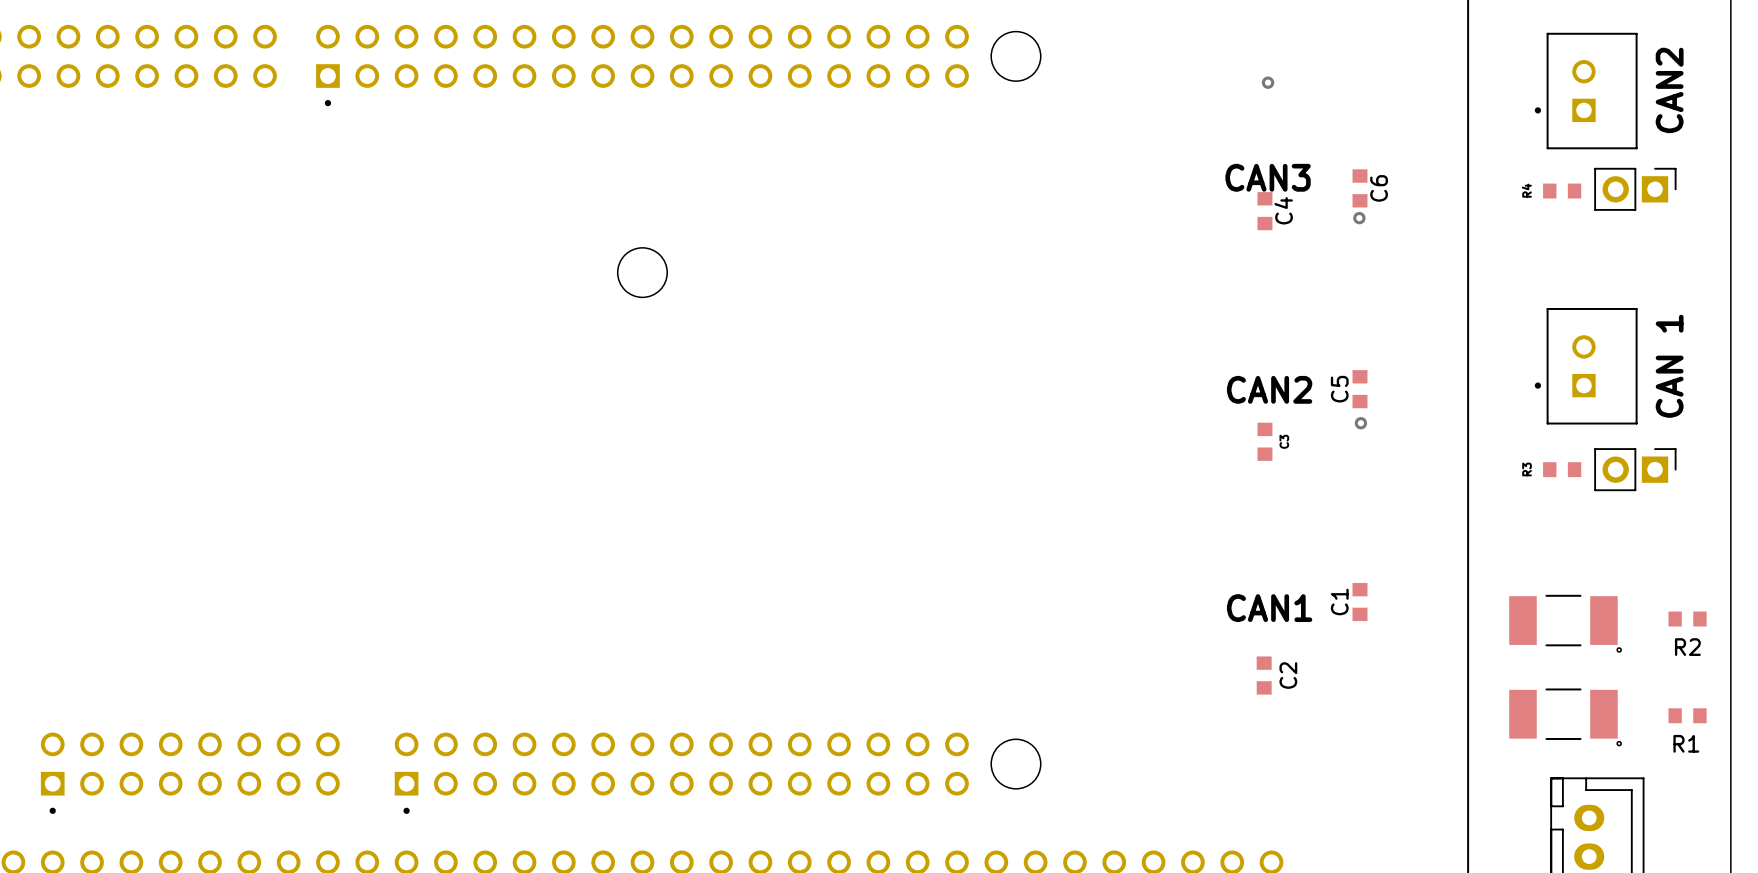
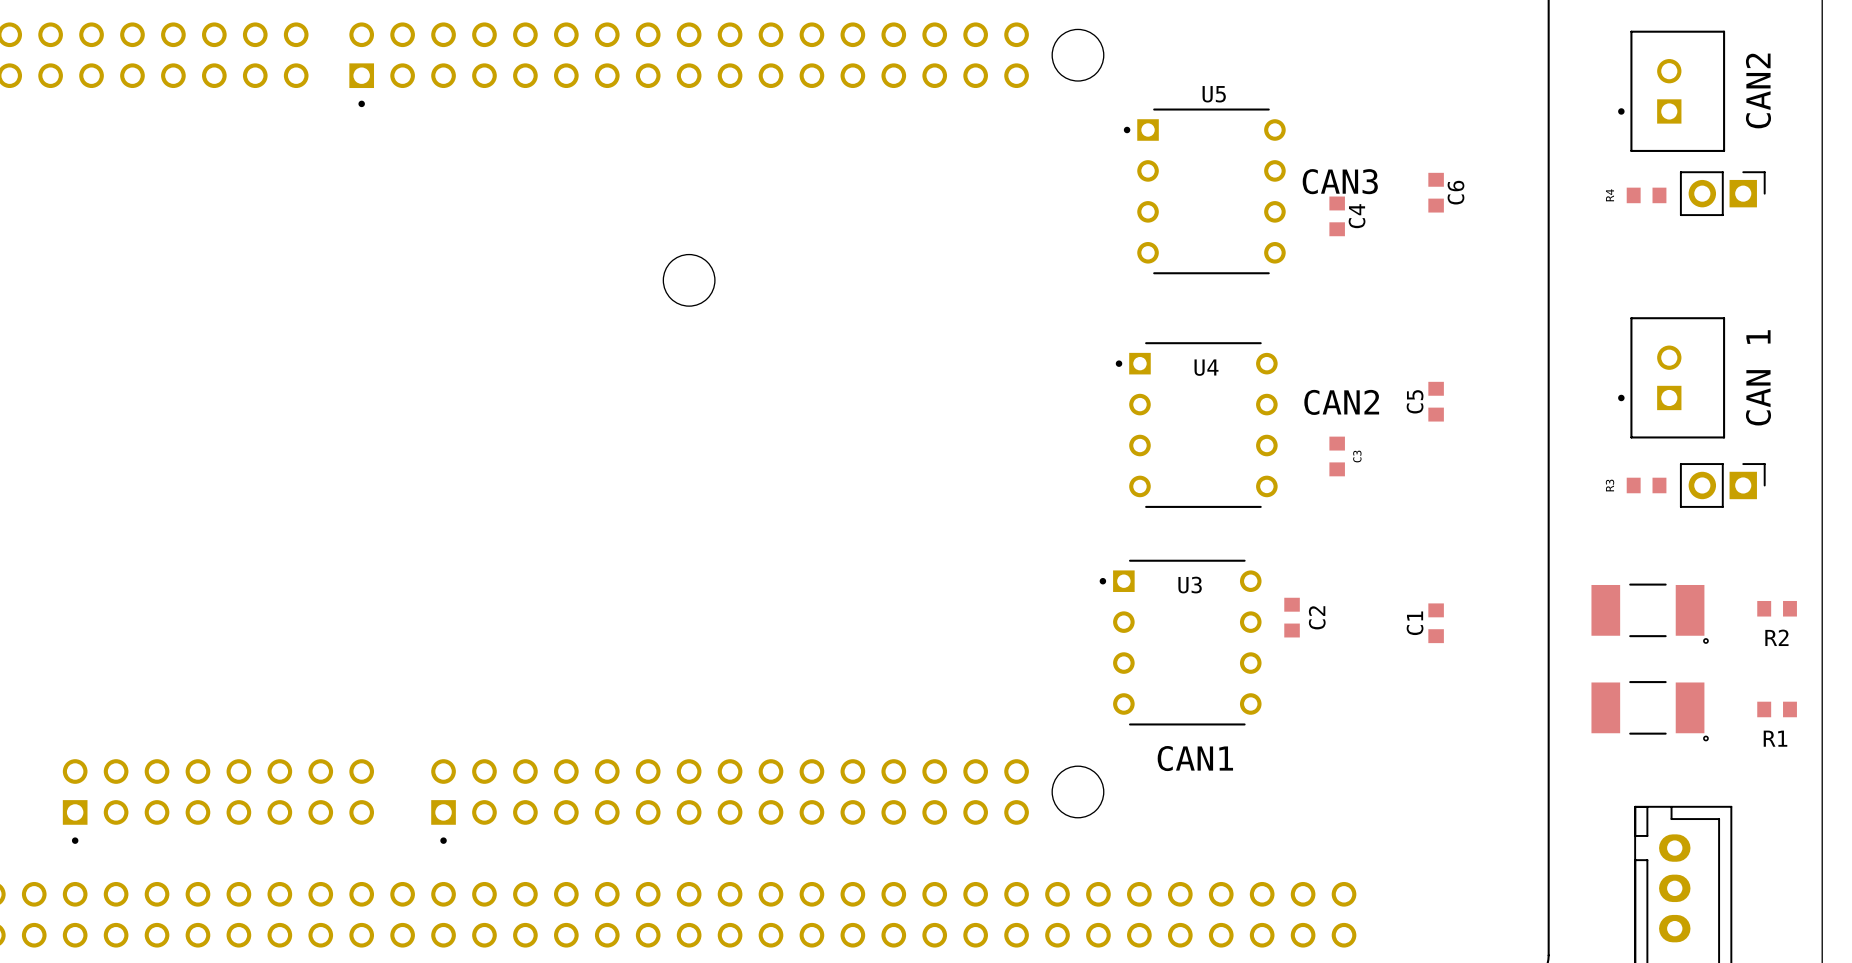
via: (1268, 82) -> none
U5: none -> (1204, 191)
via: (1359, 218) -> none
U4: none -> (1196, 425)
via: (1360, 423) -> none
text position: CAN1 (1269, 608) -> CAN1 (1195, 758)
R2 position: (1687, 619) -> (1777, 608)
U3: none -> (1180, 642)
part position: (1565, 623) -> (1650, 613)
C2 position: (1264, 675) -> (1292, 617)
R1 position: (1687, 715) -> (1777, 709)
part position: (1565, 717) -> (1650, 711)

